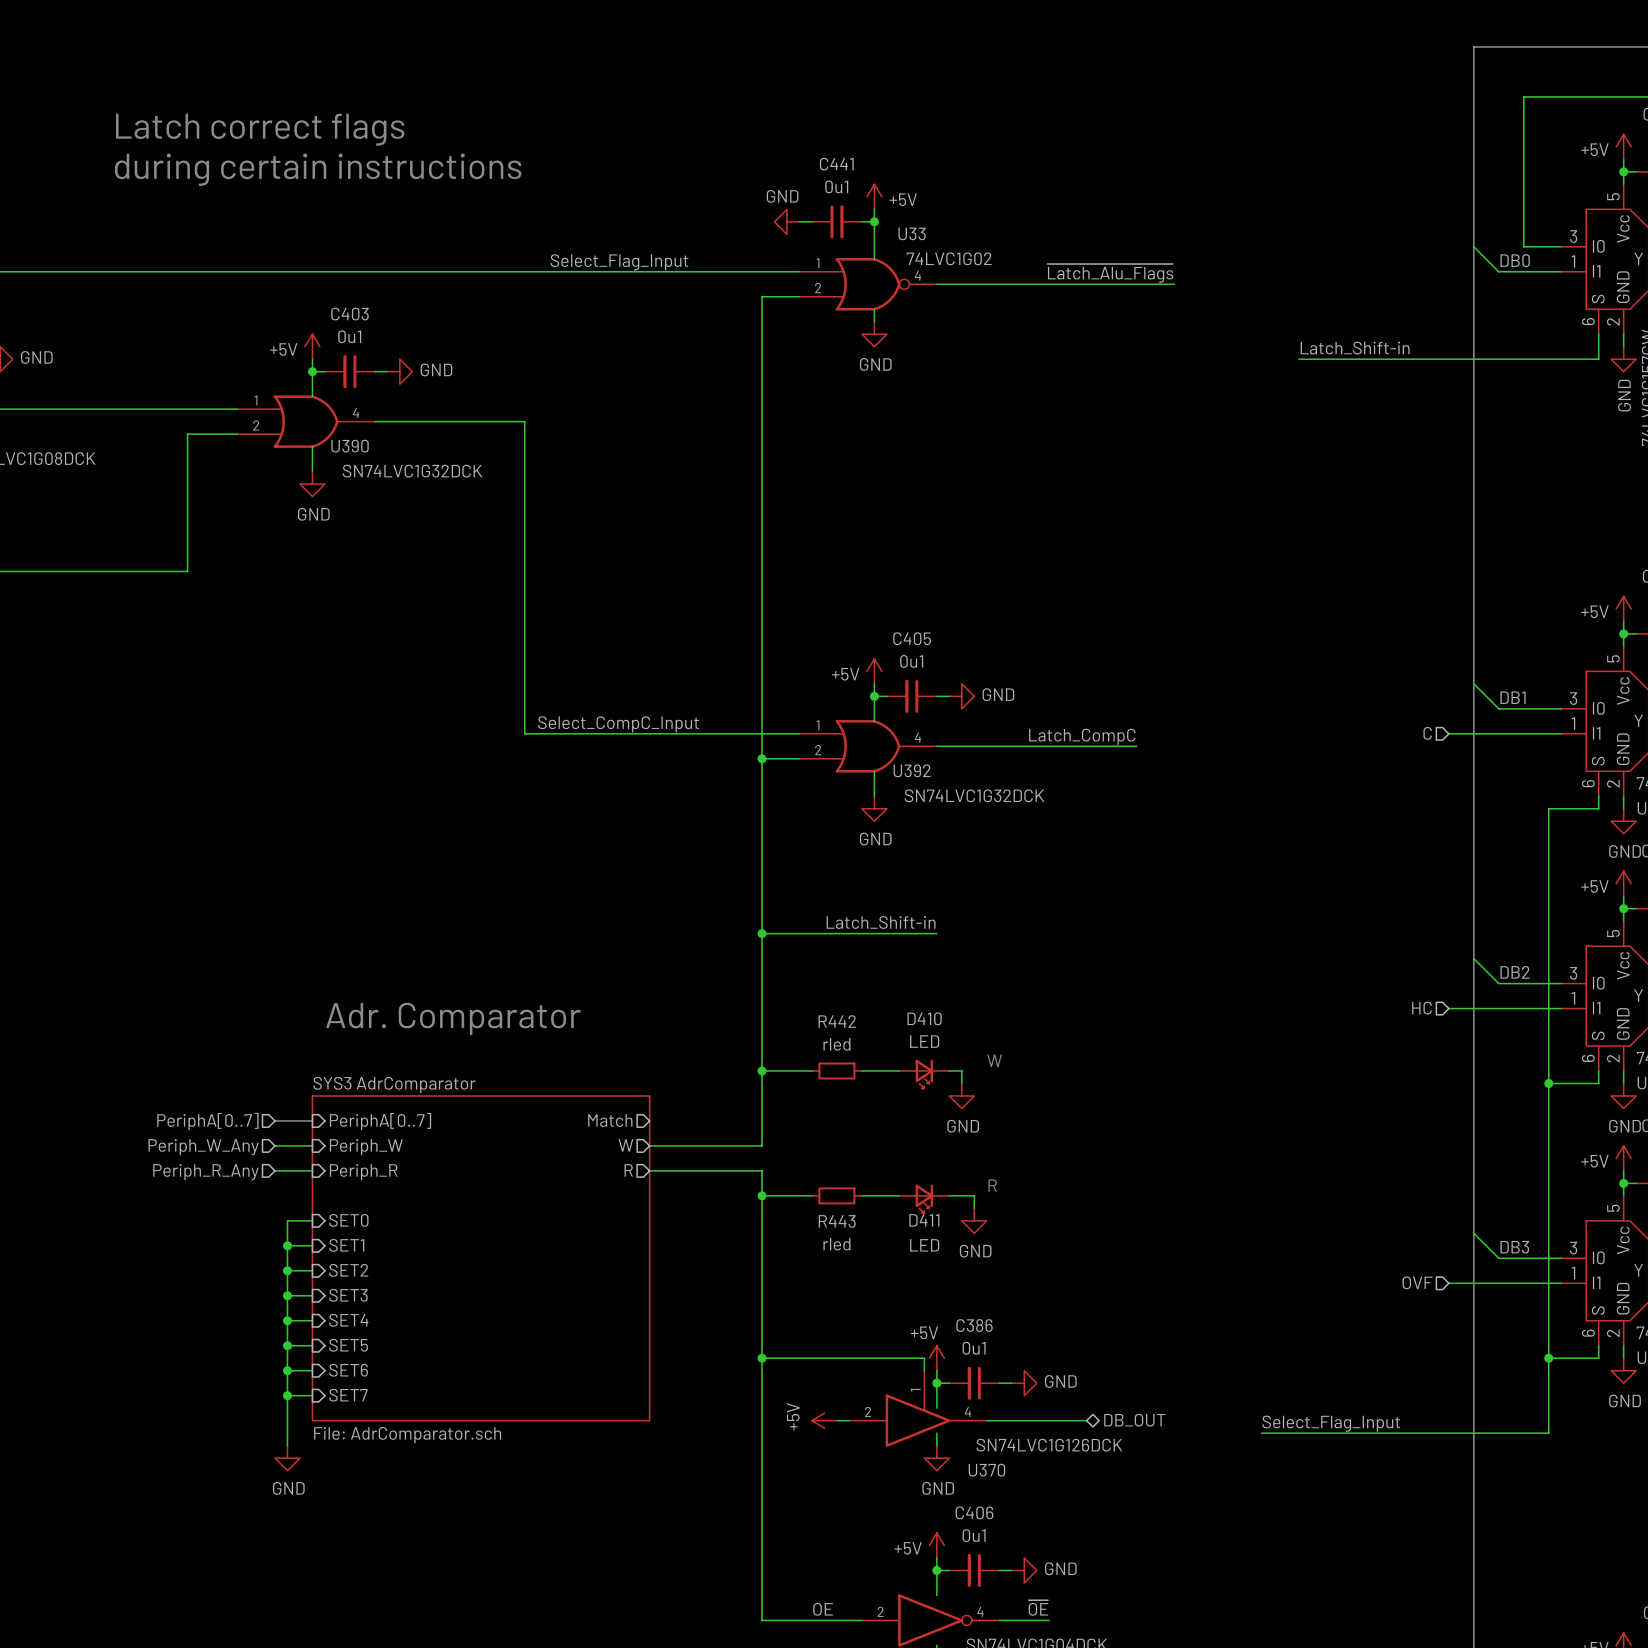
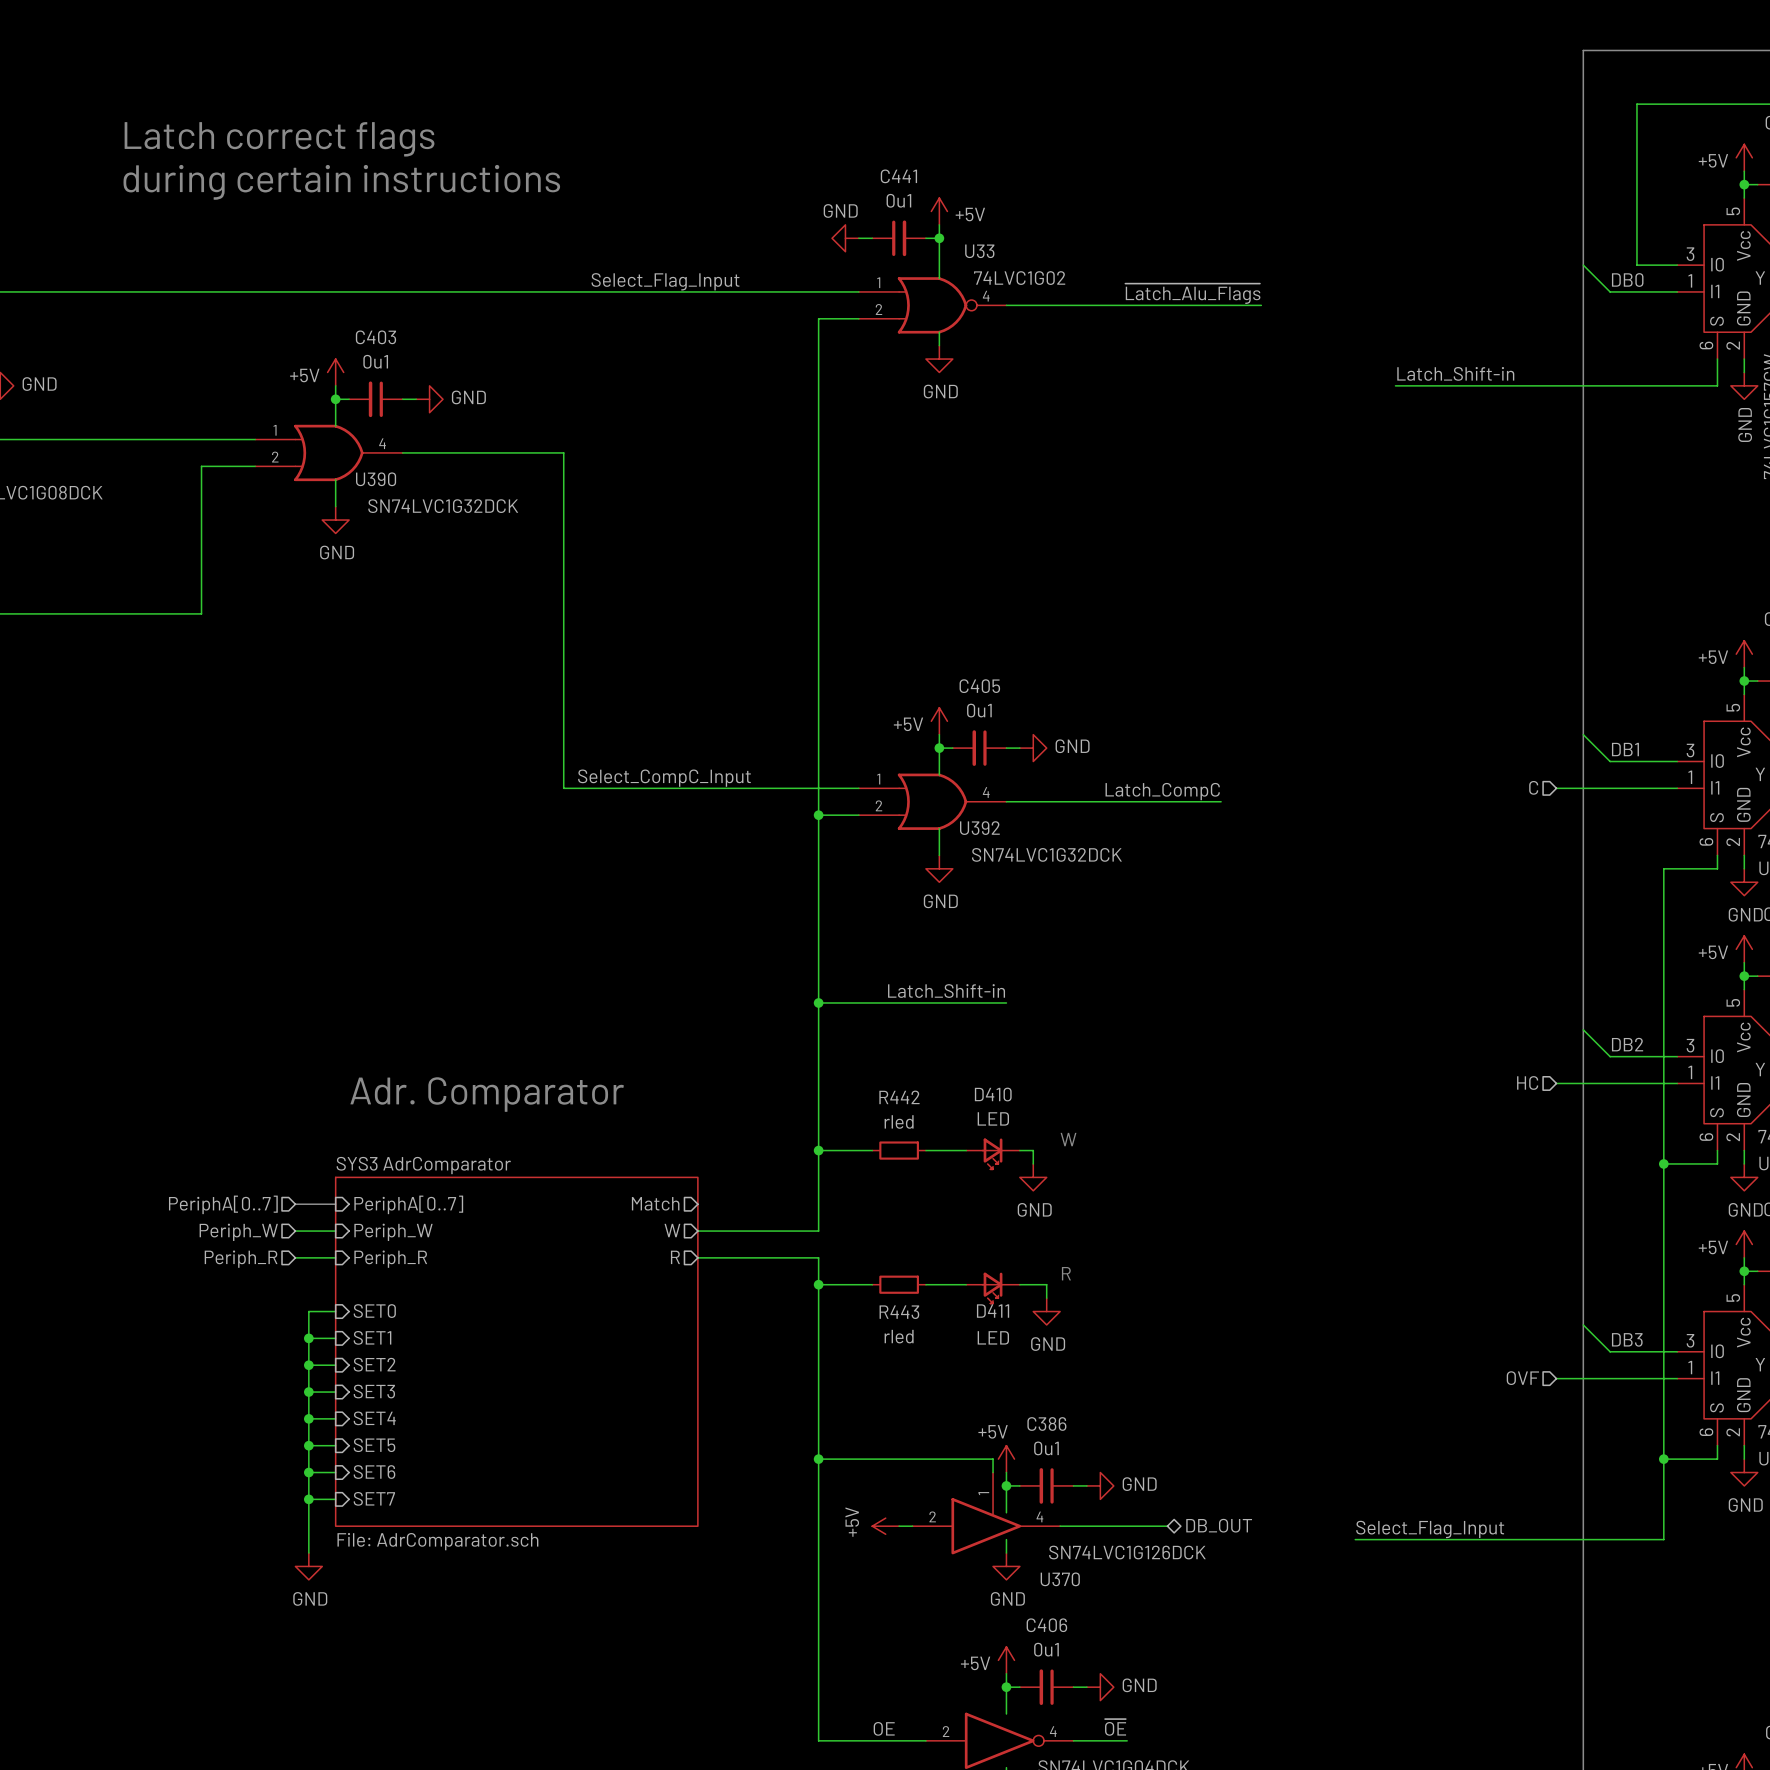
hierarchical label: Periph_W_Any (203, 1147) -> Periph_W (238, 1232)
hierarchical label: Periph_R_Any (205, 1172) -> Periph_R (241, 1259)

